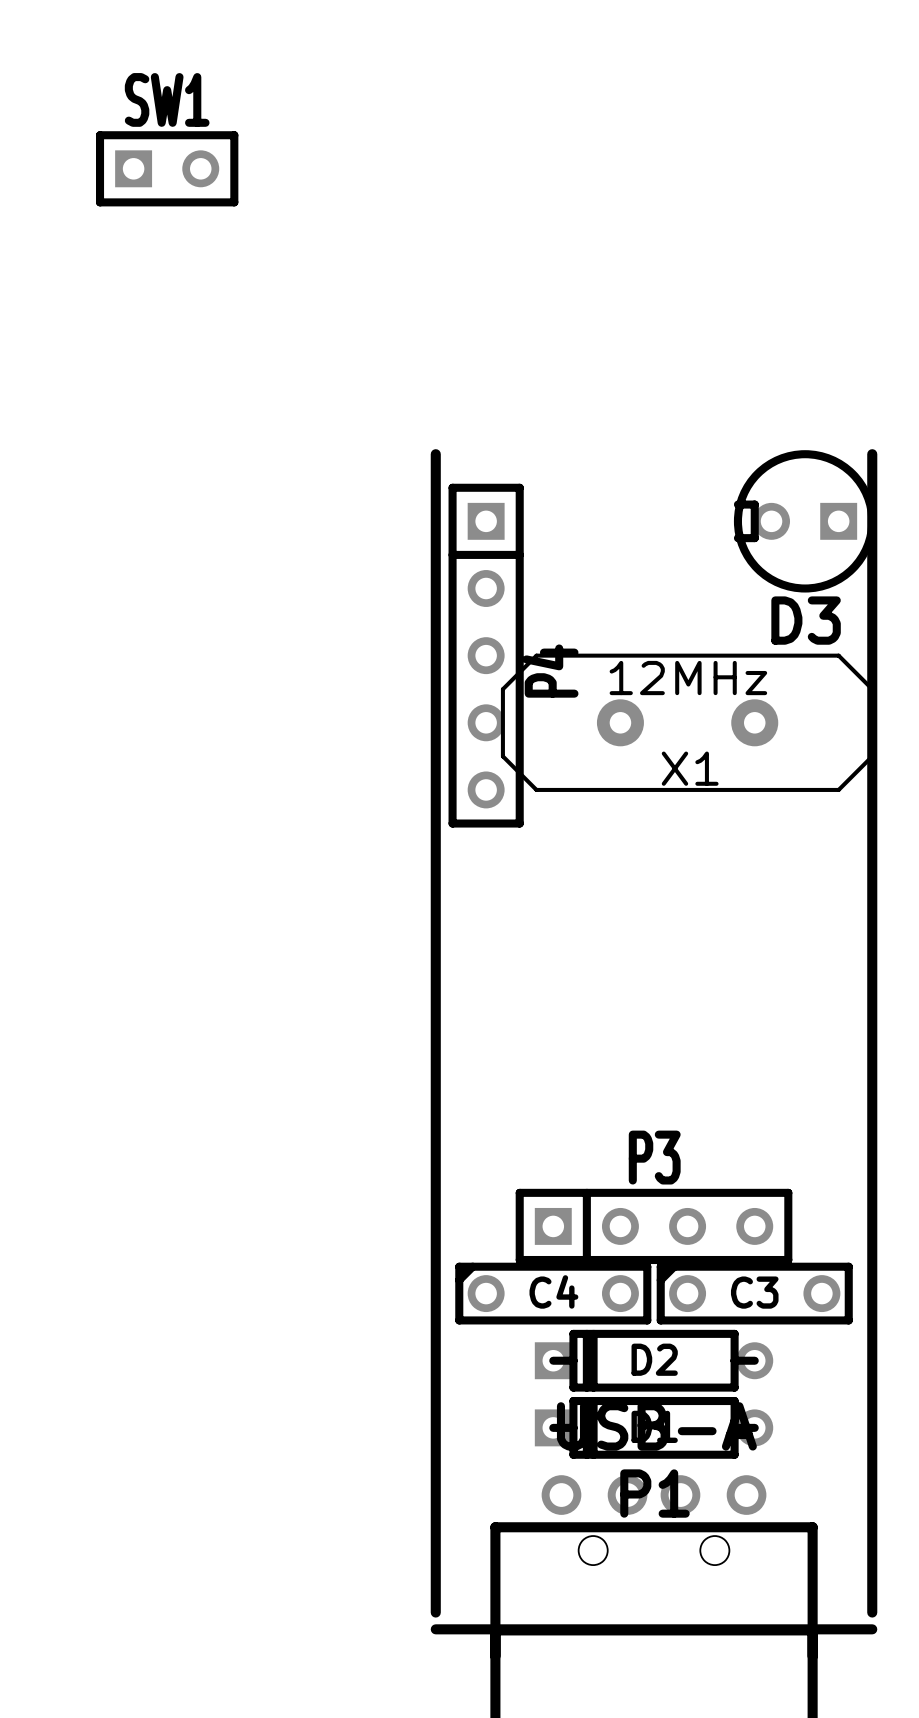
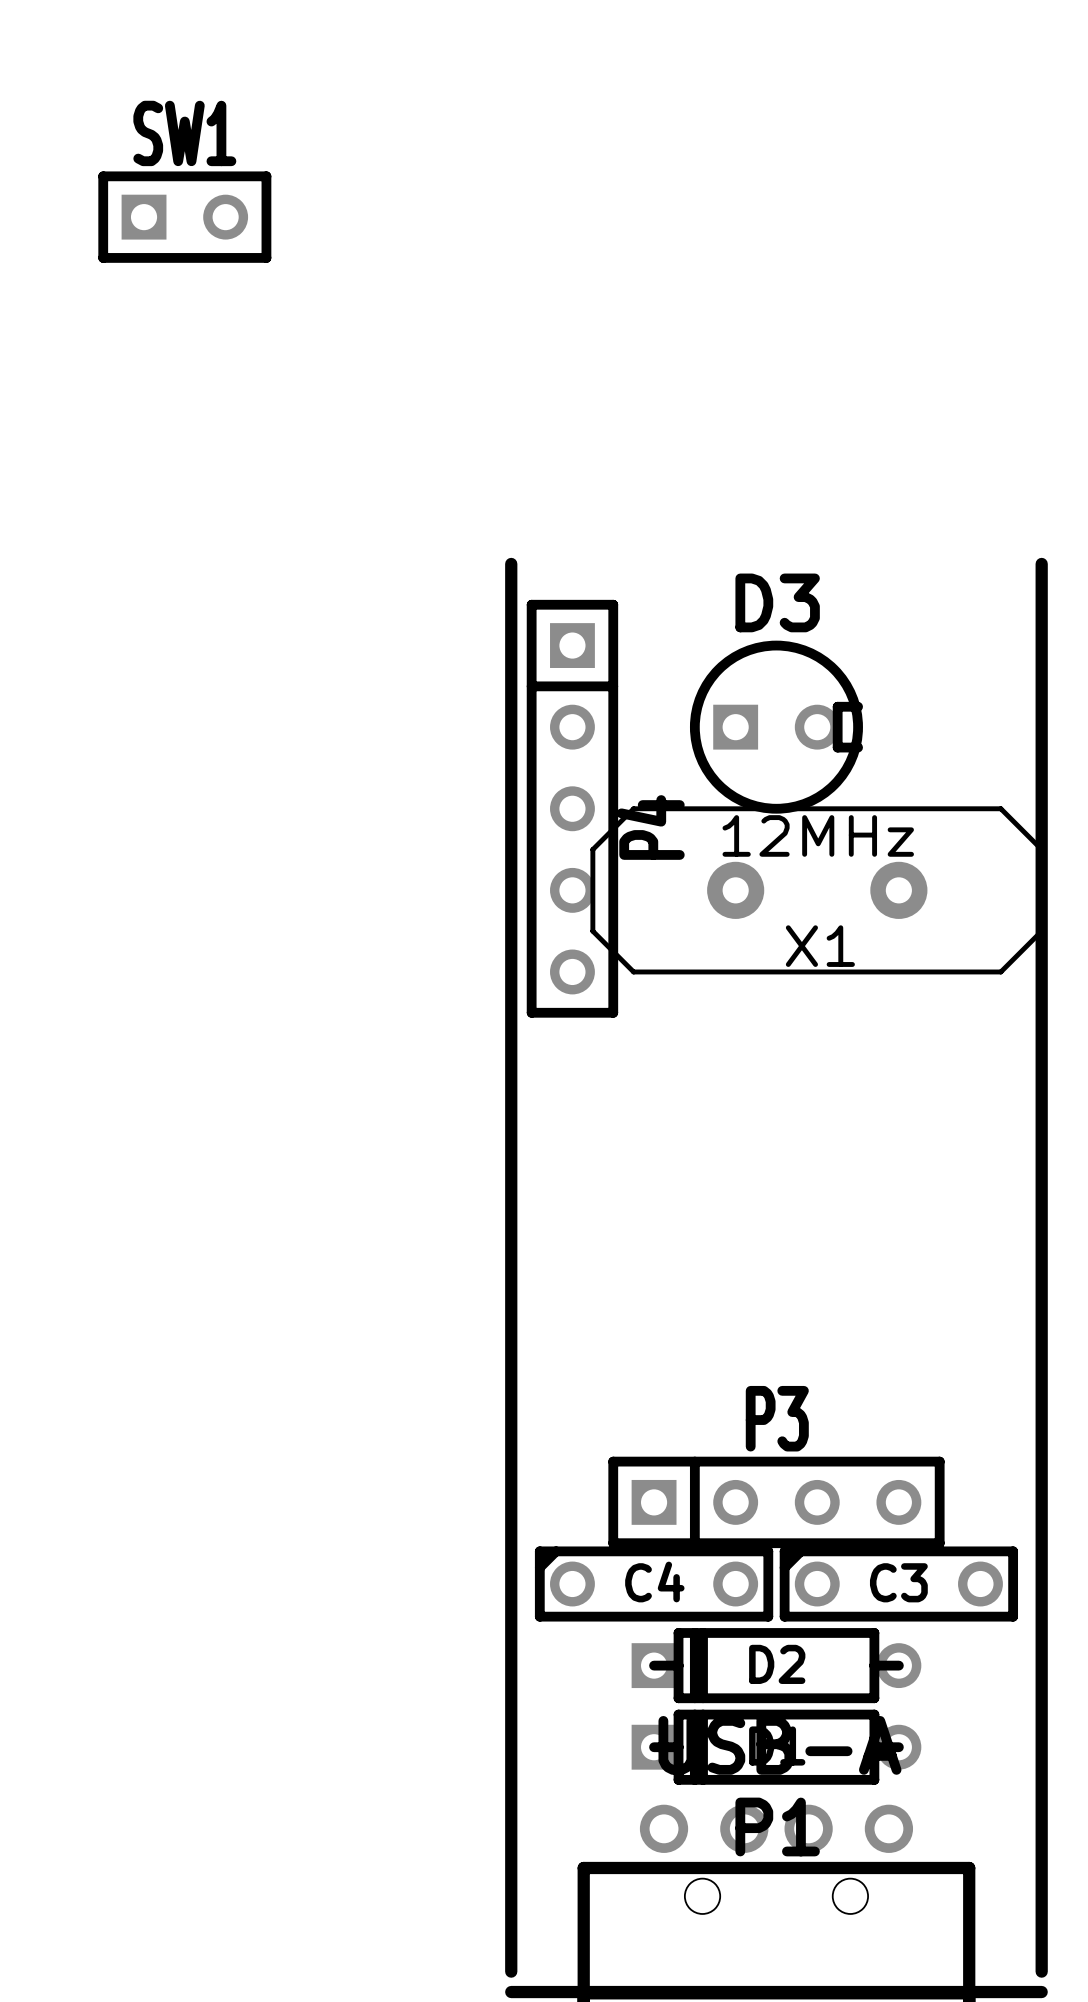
D3 rotation: 0° (805, 521) -> 180° (776, 727)
D3 position: (805, 521) -> (776, 727)

